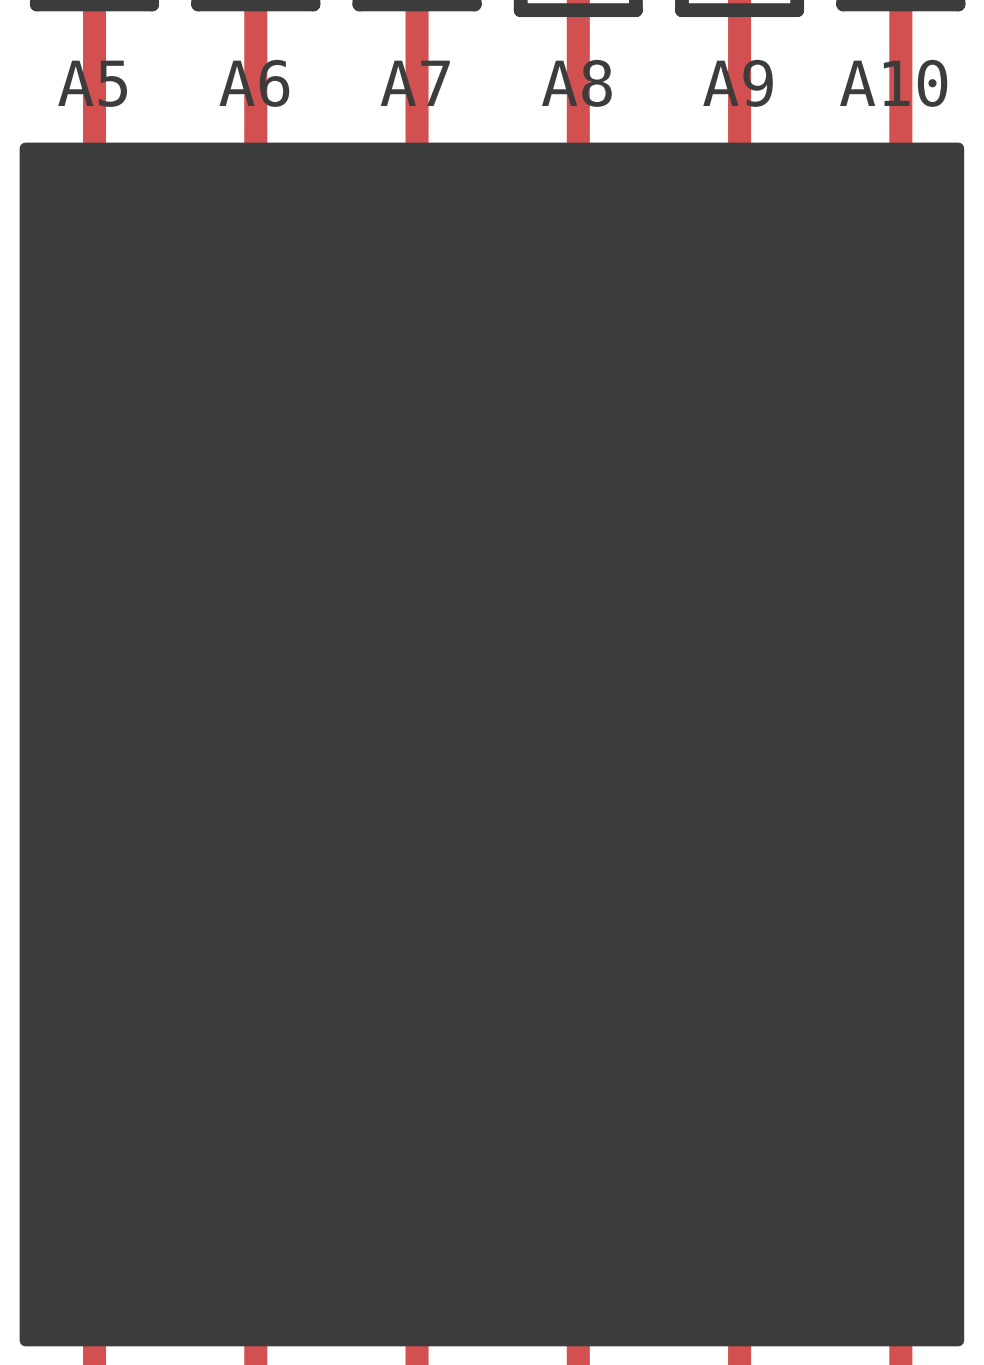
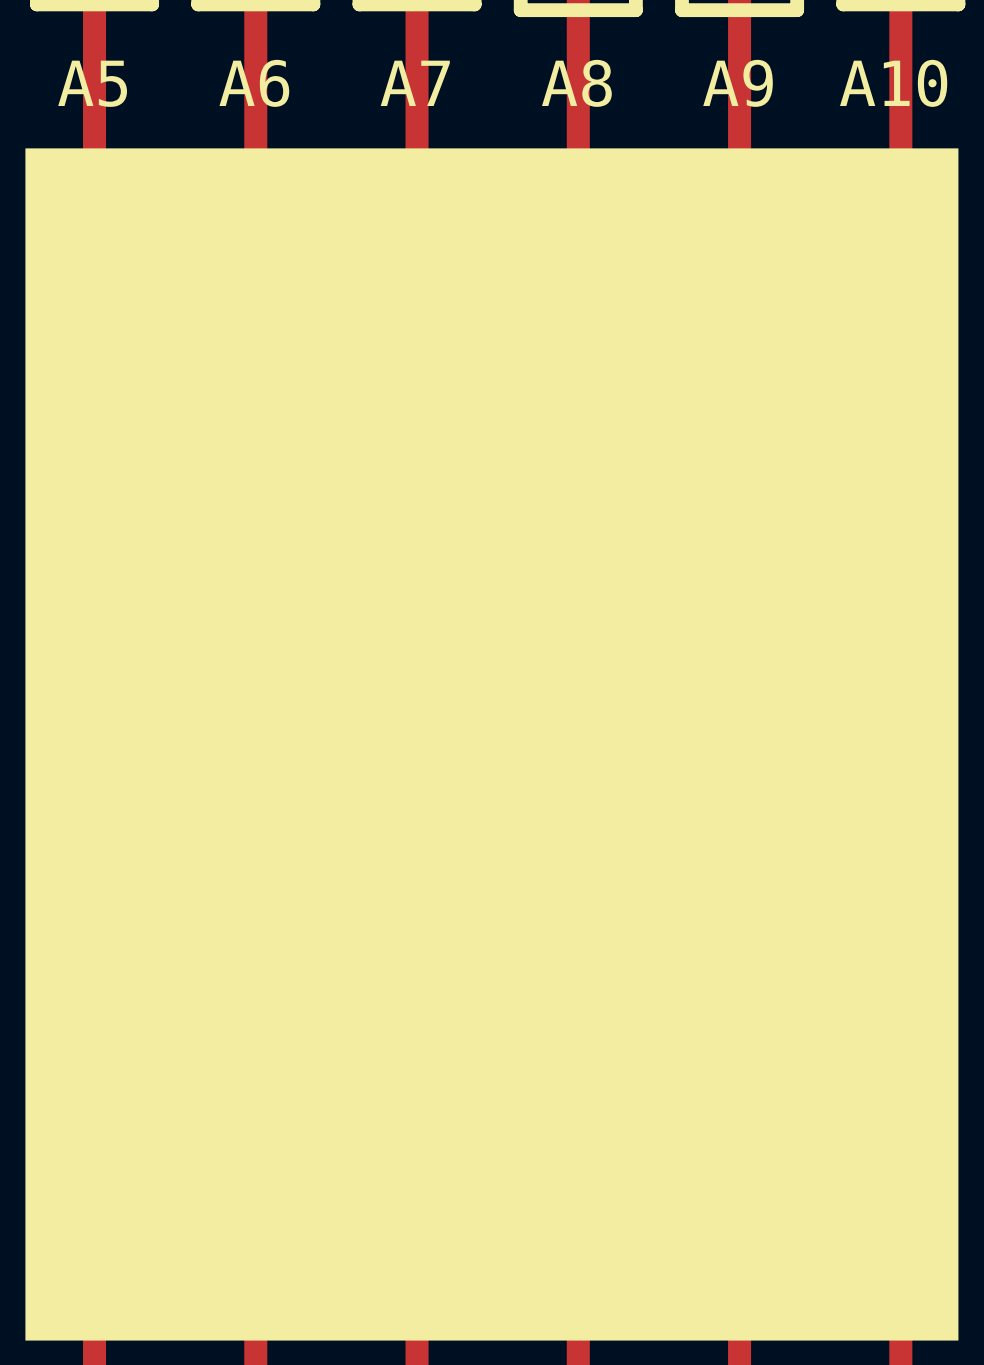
drawing shape: [19, 142, 965, 1347] -> [25, 148, 959, 1341]

